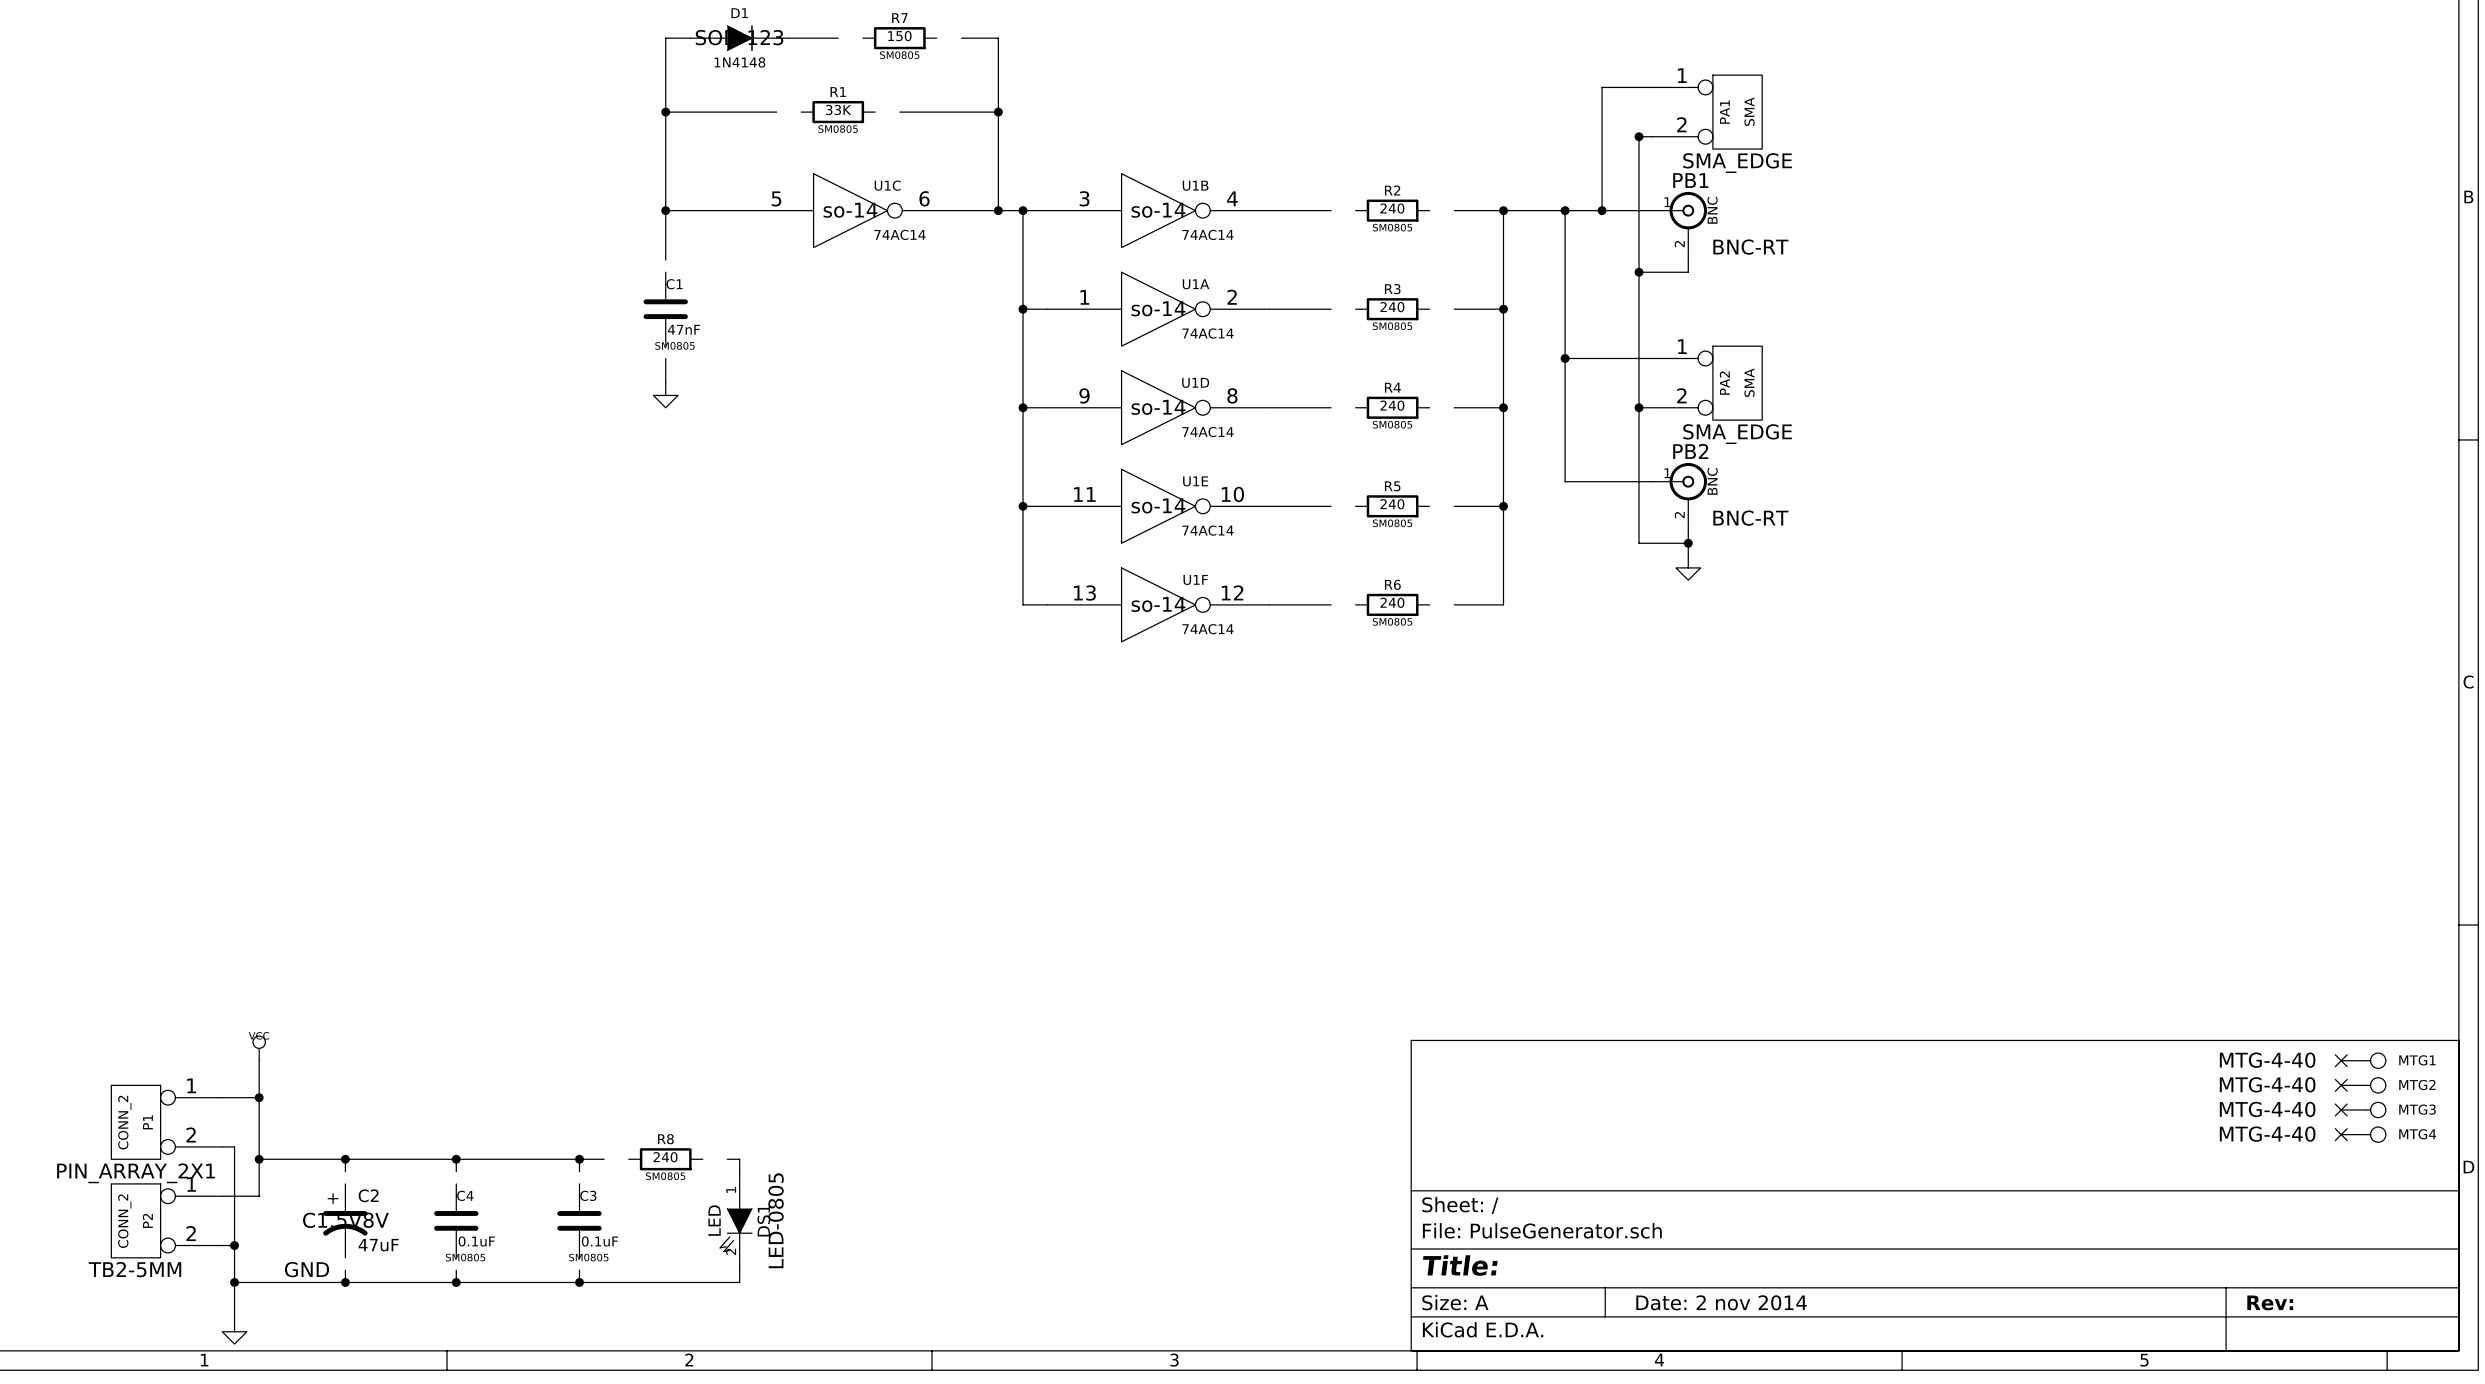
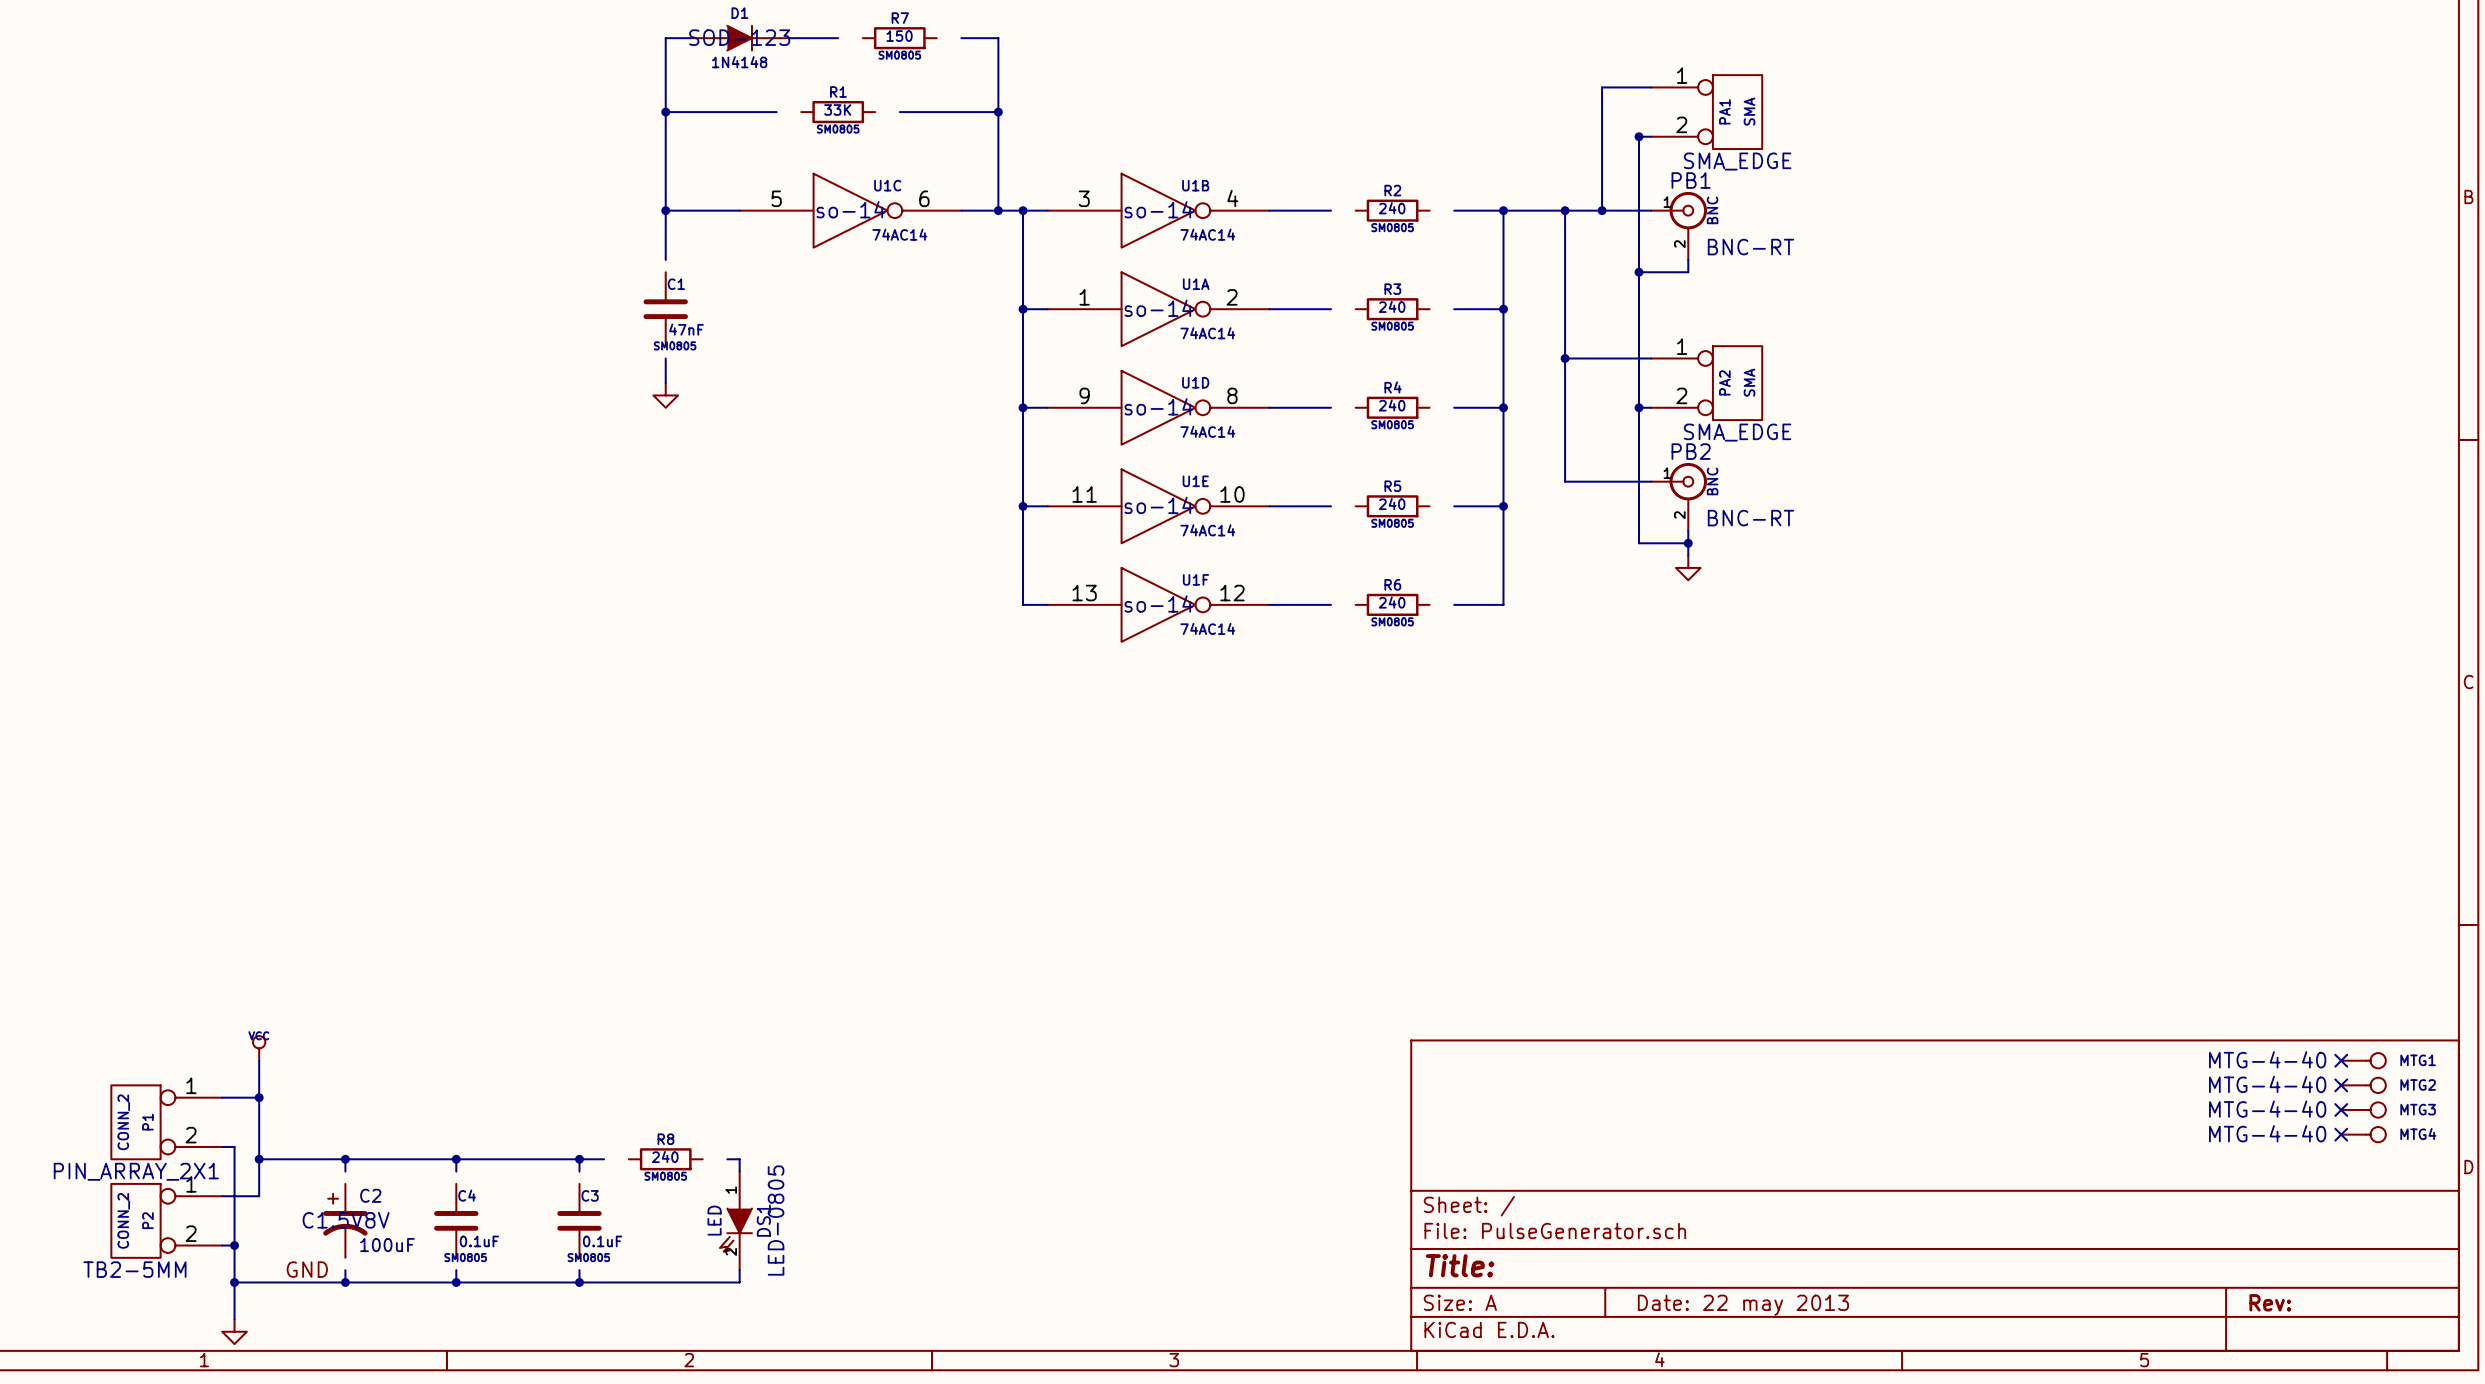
C2 value: 47uF (378, 1245) -> 100uF (387, 1245)
title block: Date: 2 nov 2014 (1721, 1302) -> Date: 22 may 2013 (1743, 1305)

